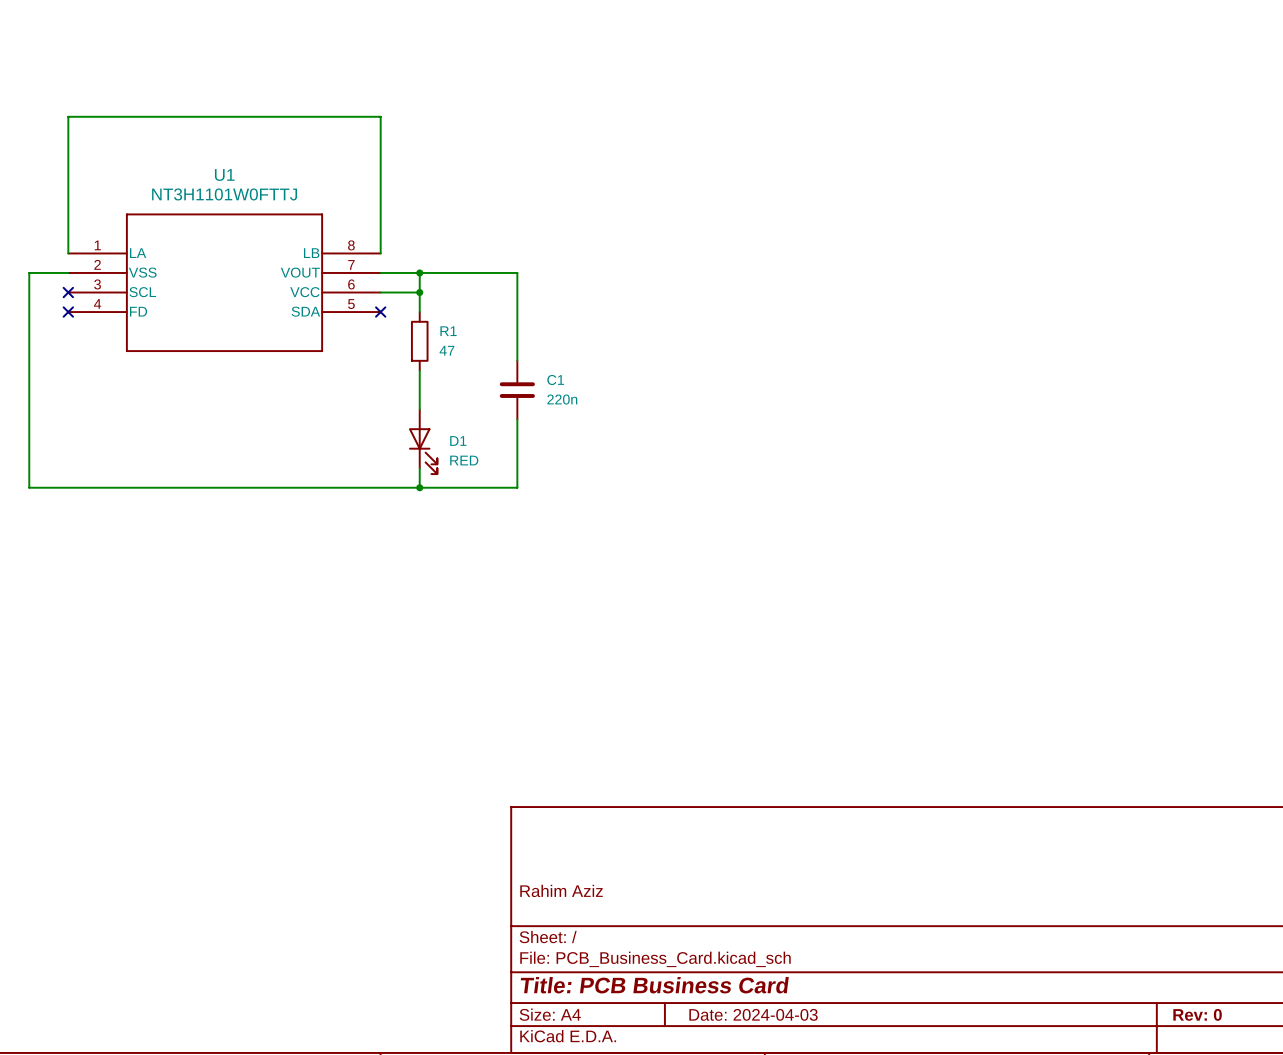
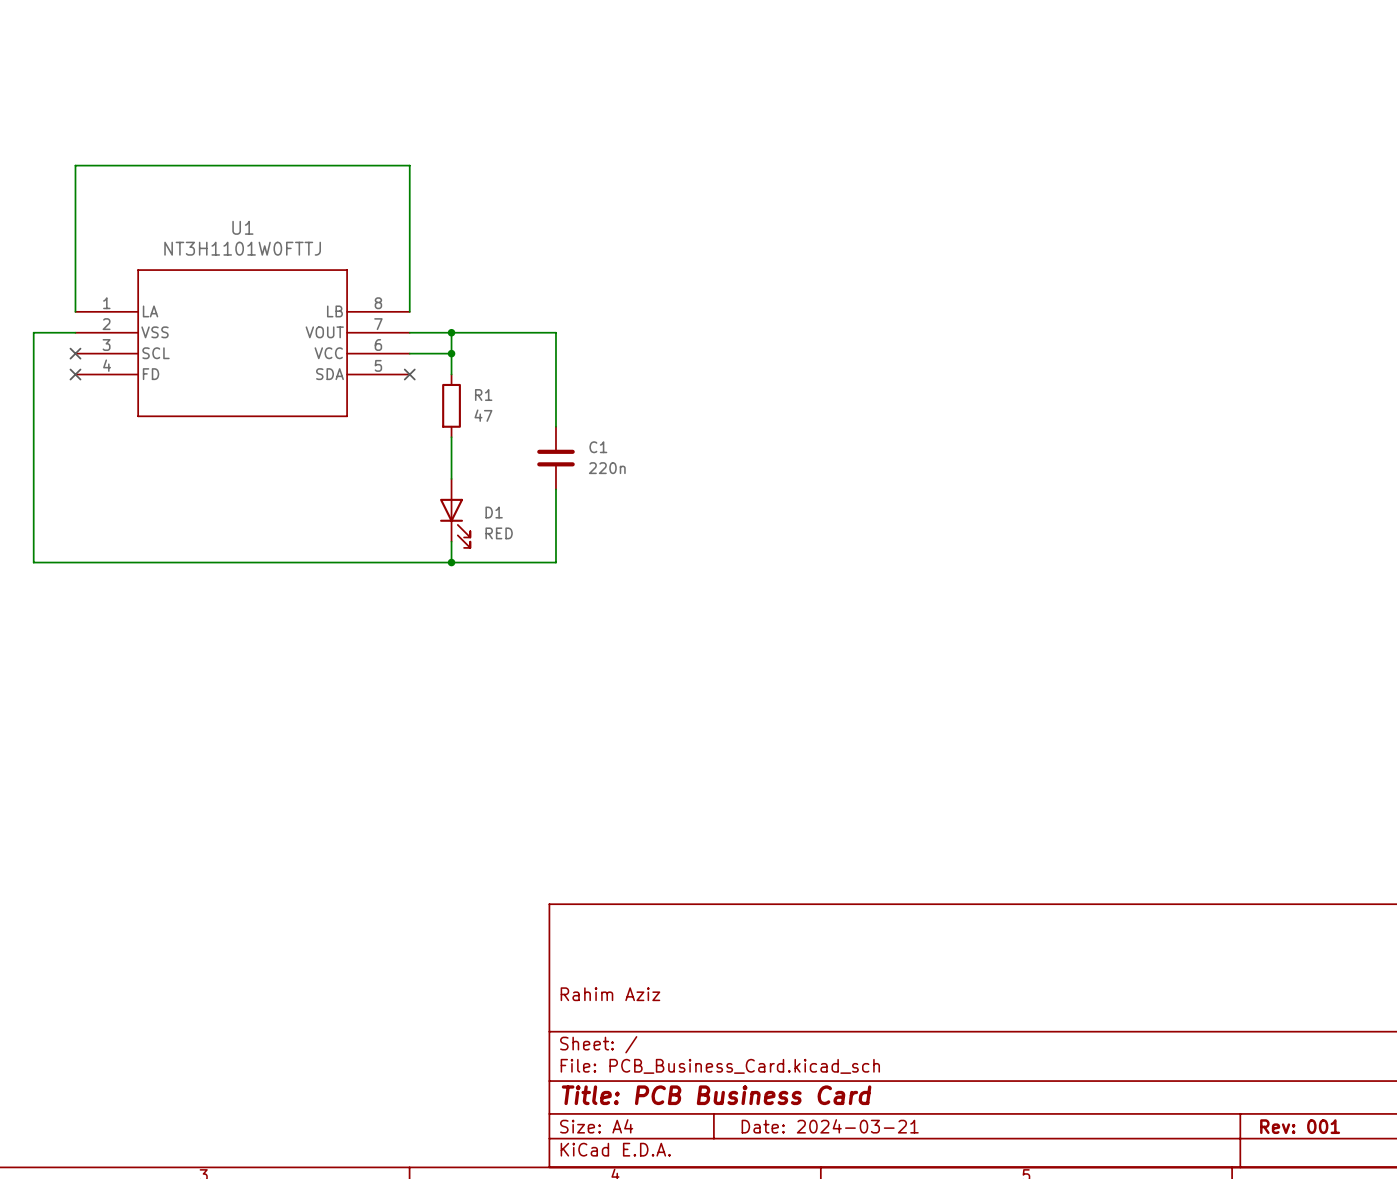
title block: Date: 2024-04-03 (753, 1014) -> Date: 2024-03-21 (830, 1126)
title block: Rev: 0 (1197, 1014) -> Rev: 001 (1300, 1126)

